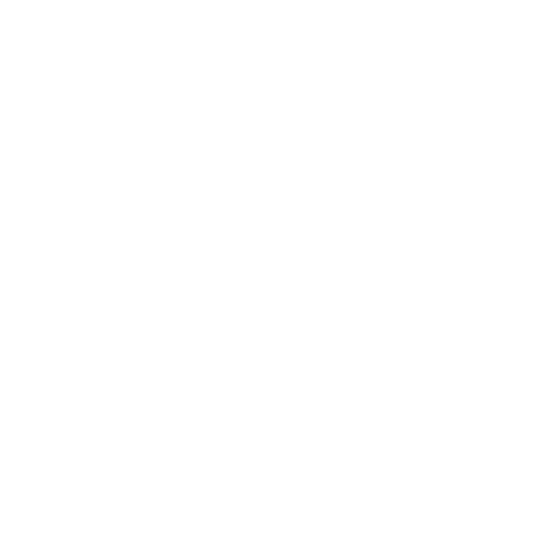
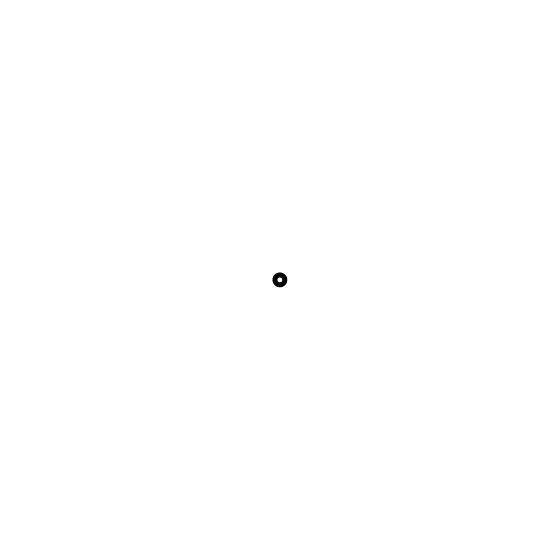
drawing: none -> [272, 272, 288, 288]

